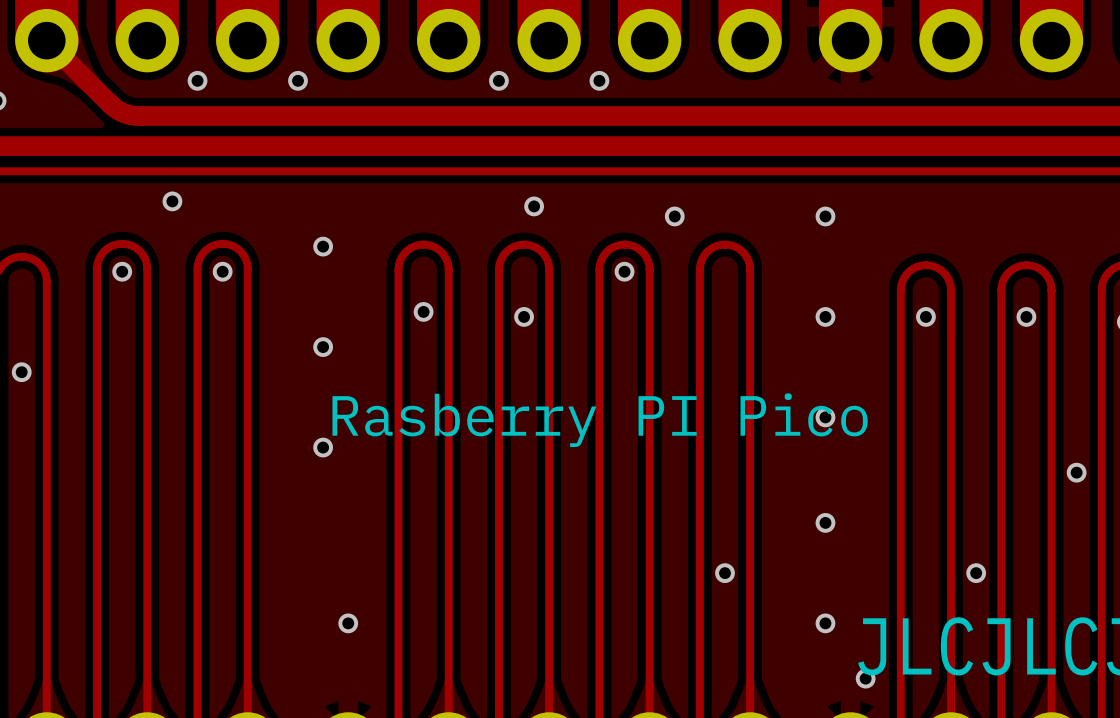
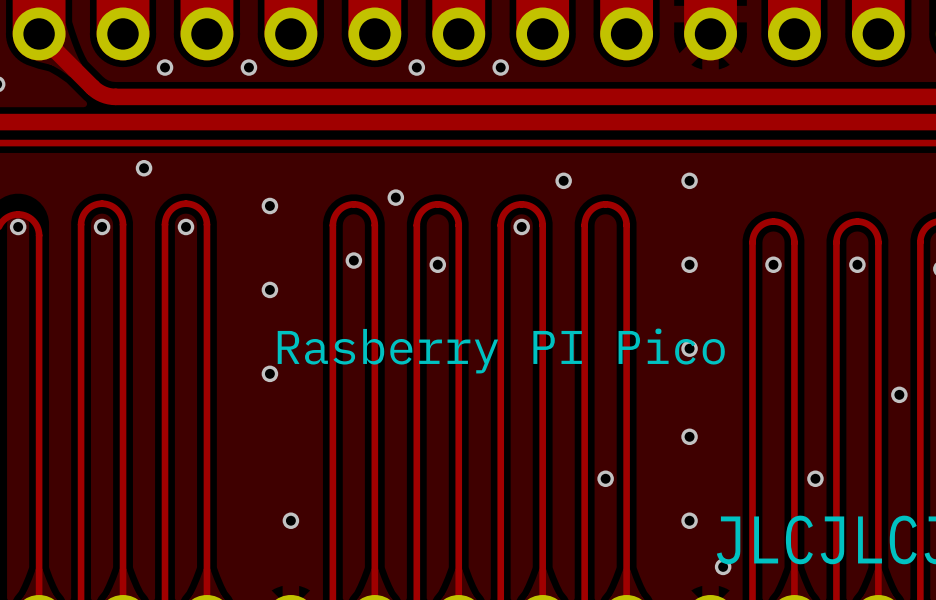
via position: (534, 206) -> (395, 197)
via position: (21, 372) -> (18, 226)

